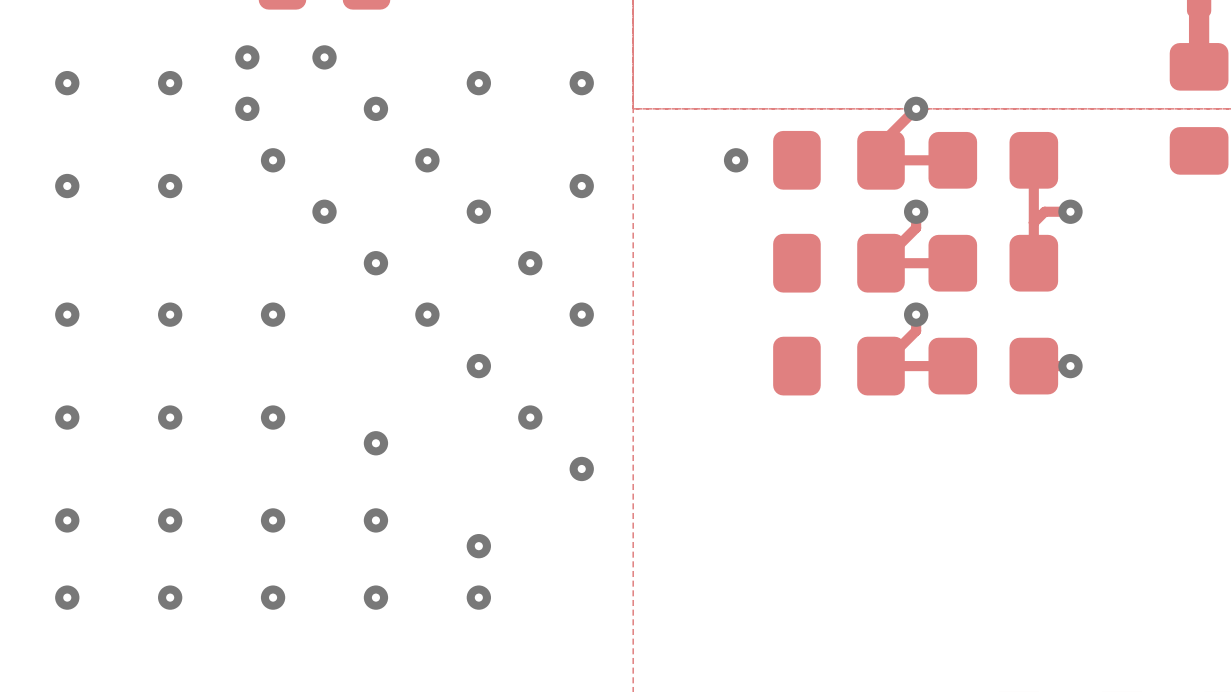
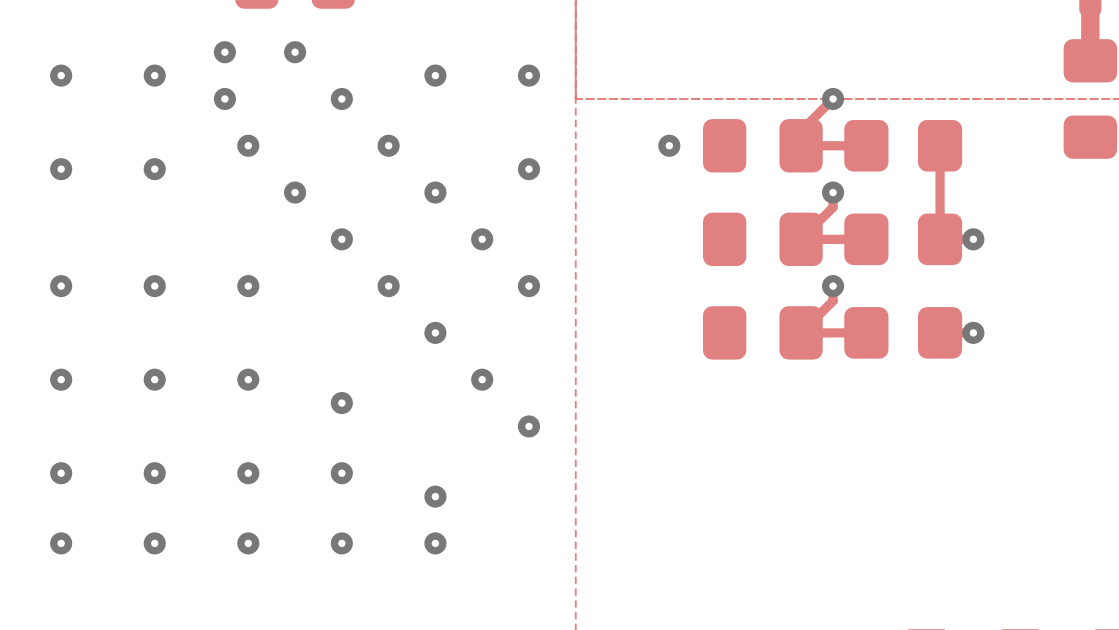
top track: (1070, 211) (1044, 211) (1033, 222) -> none
via position: (1070, 211) -> (973, 239)

